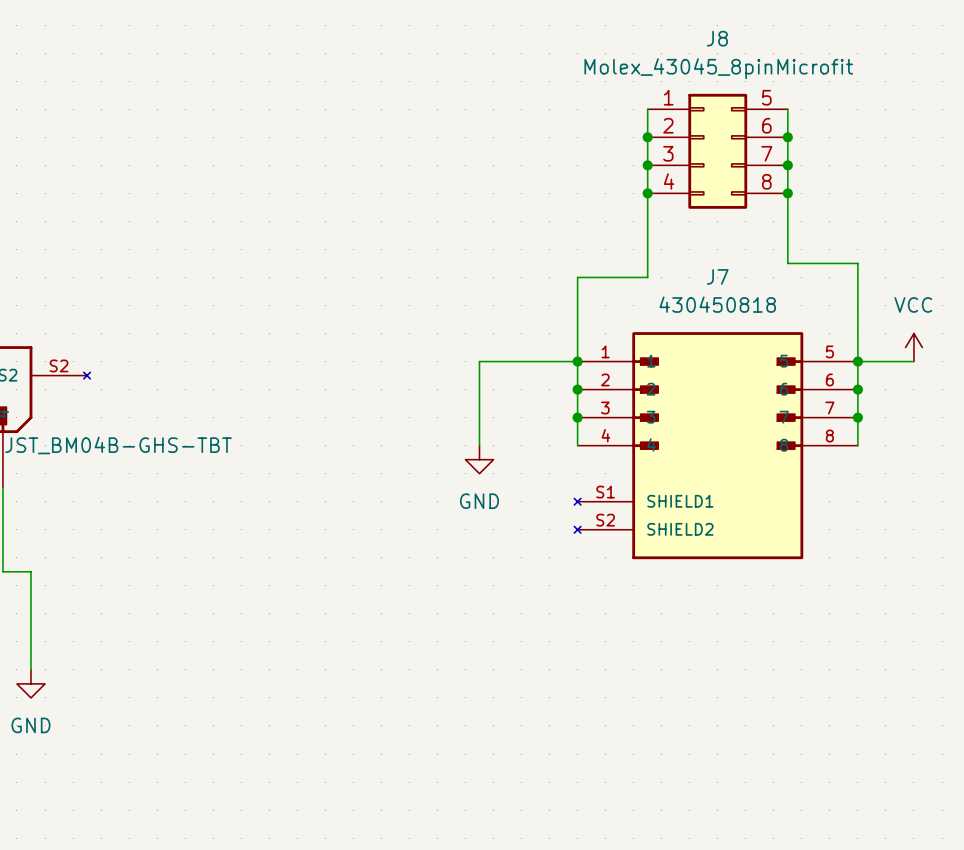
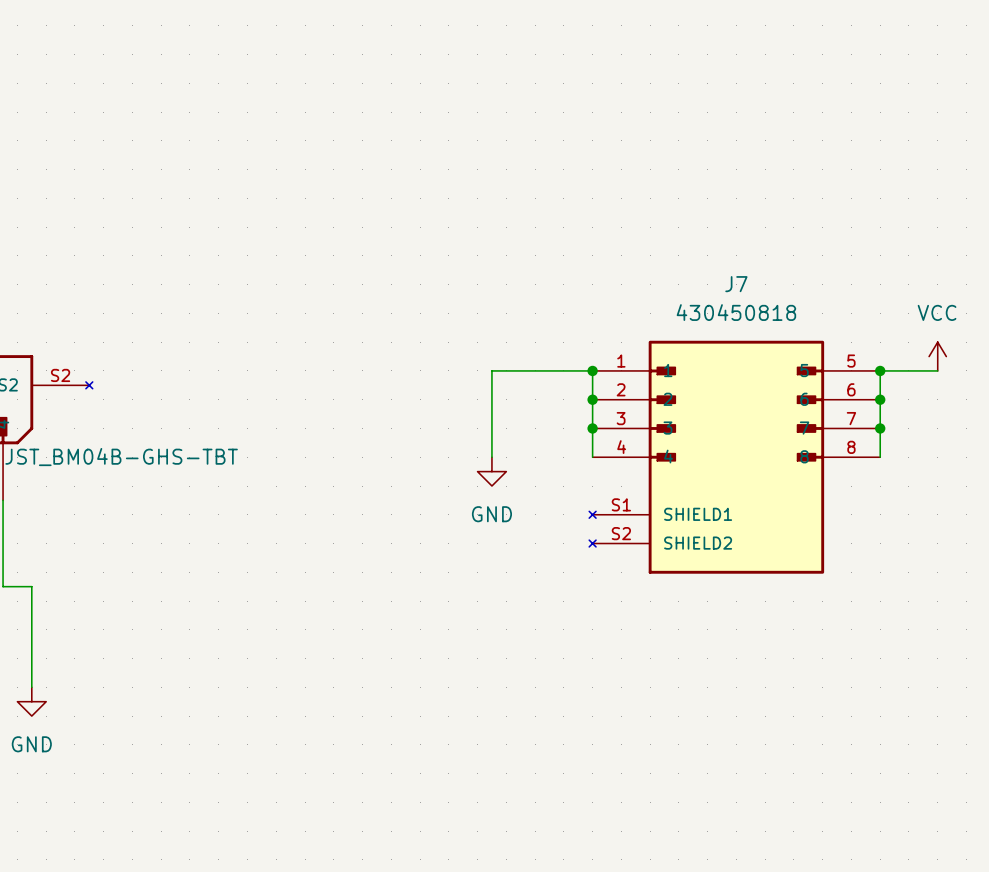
wire: (647, 109) (647, 277) (577, 277) (577, 361) -> none
wire: (787, 109) (787, 263) (857, 263) (857, 361) -> none
junction: (647, 137) -> none
junction: (787, 137) -> none
J8: Molex_43045_8pinMicrofit (717, 151) -> none
junction: (647, 165) -> none
junction: (787, 165) -> none
junction: (647, 193) -> none
junction: (787, 193) -> none

